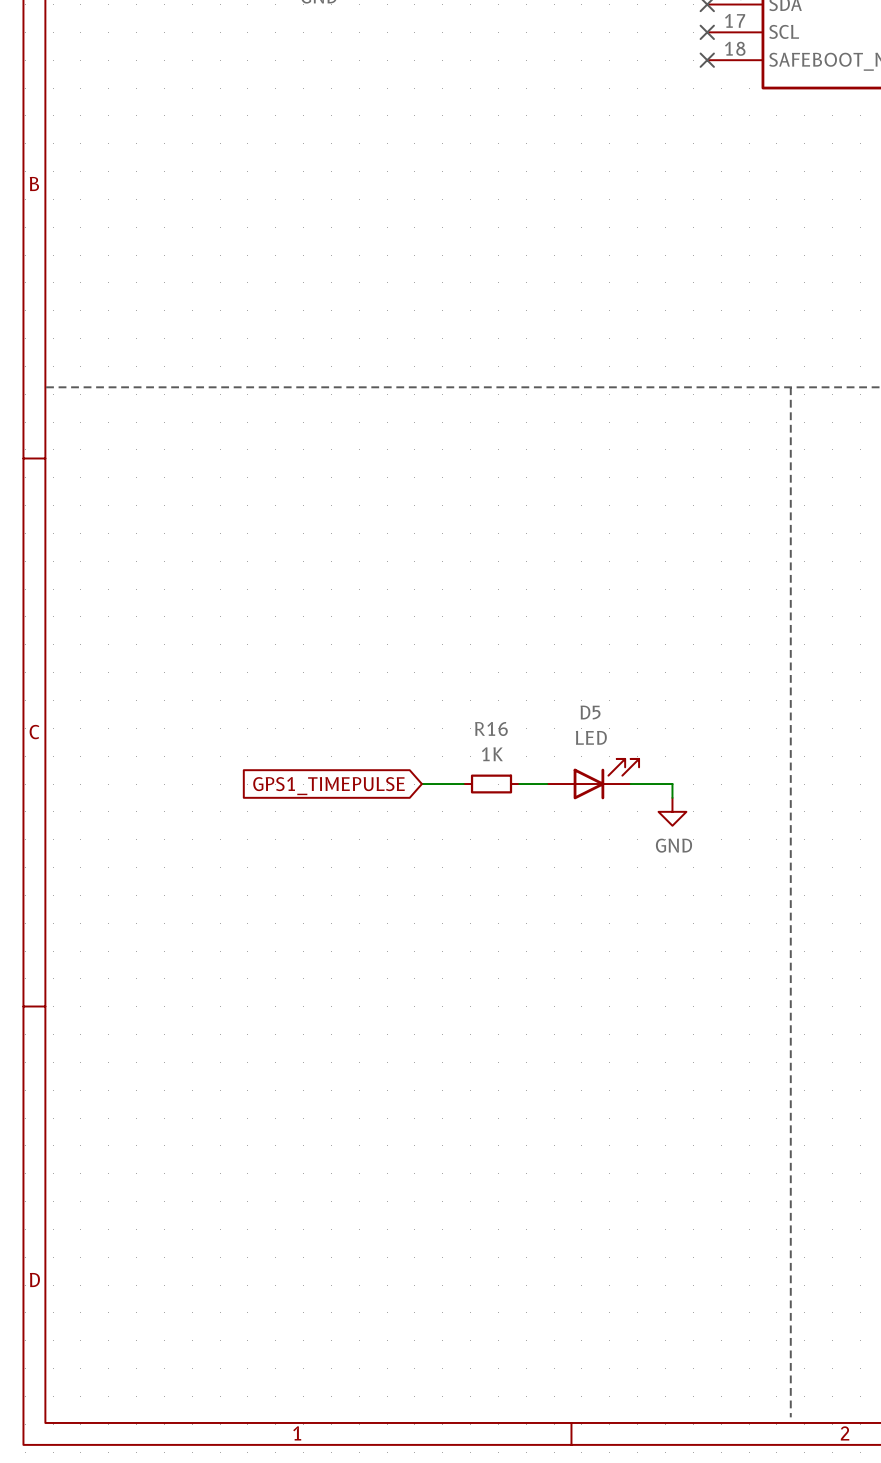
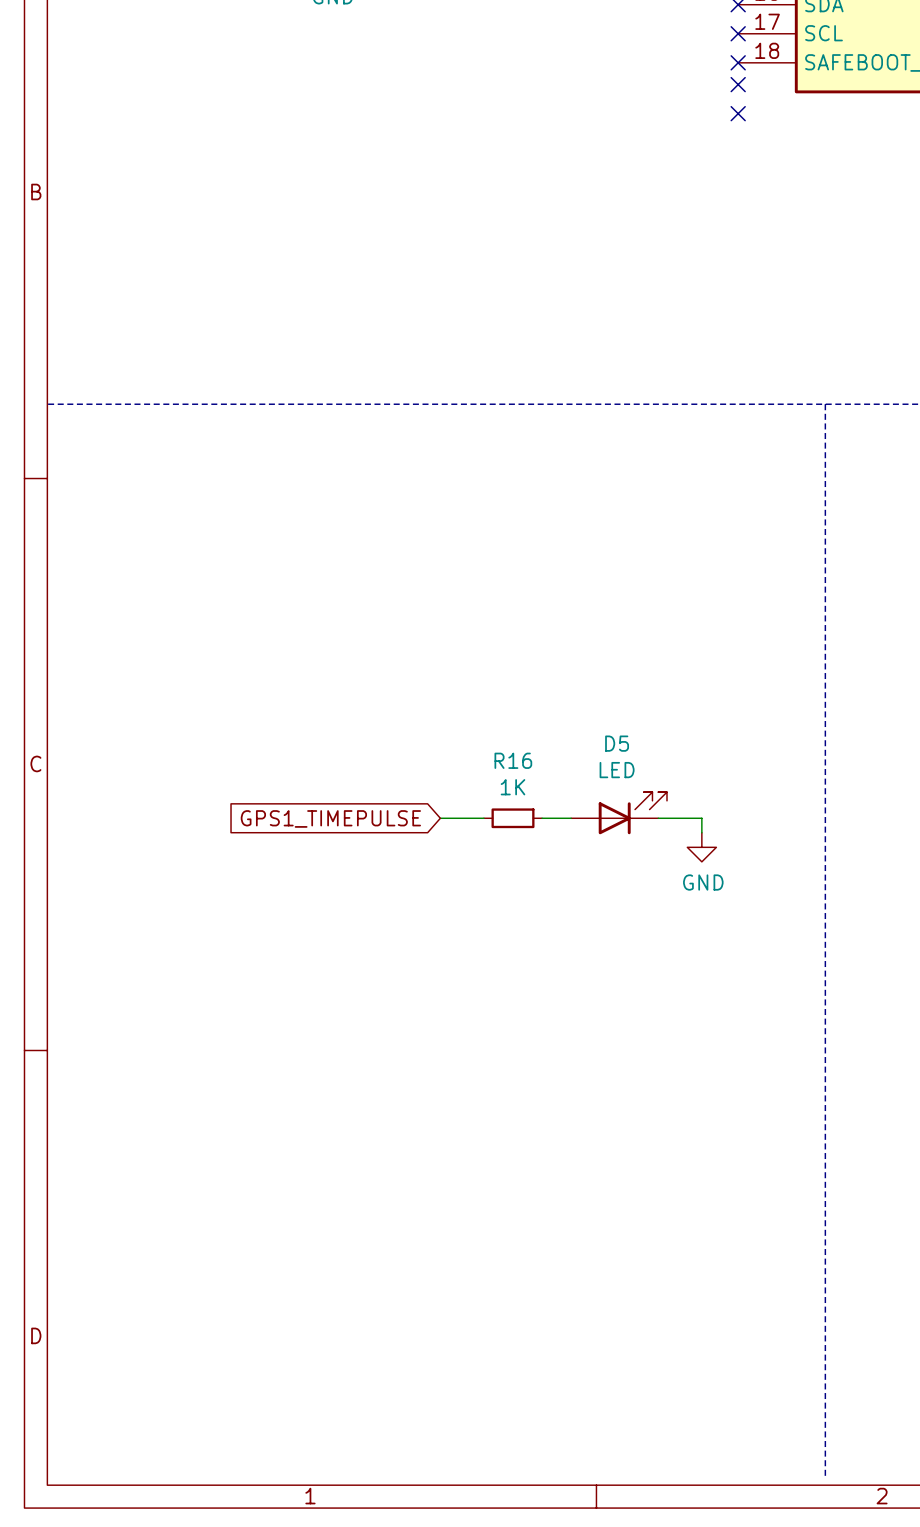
no-connect mark: none -> (738, 84)
no-connect mark: none -> (738, 113)

